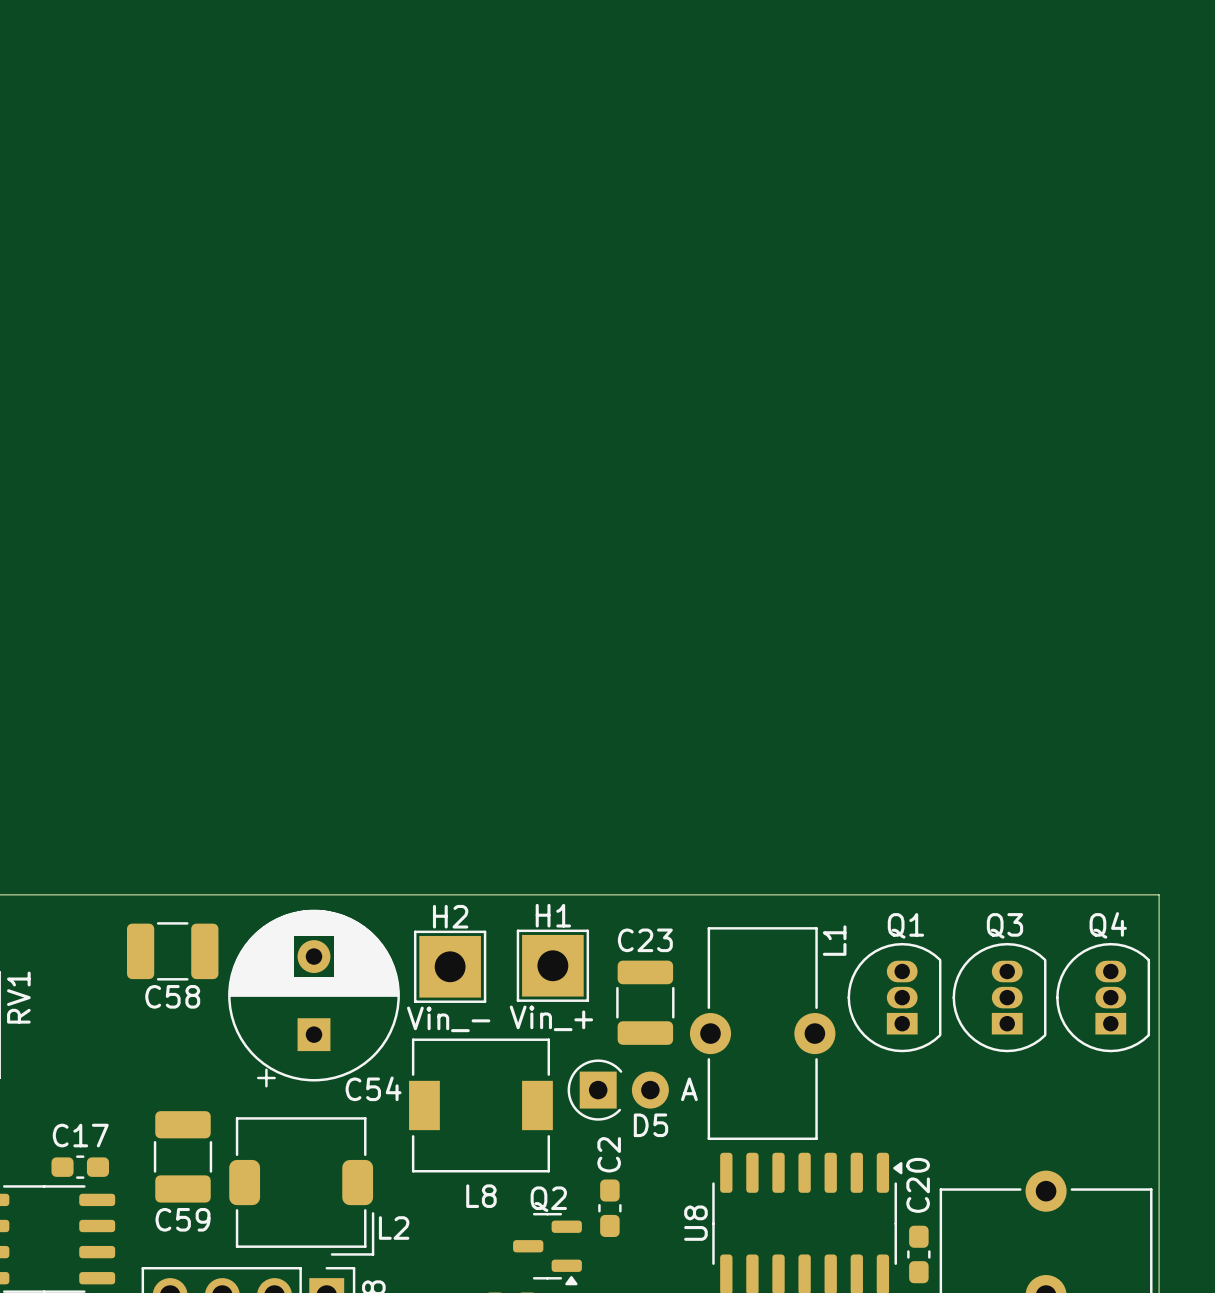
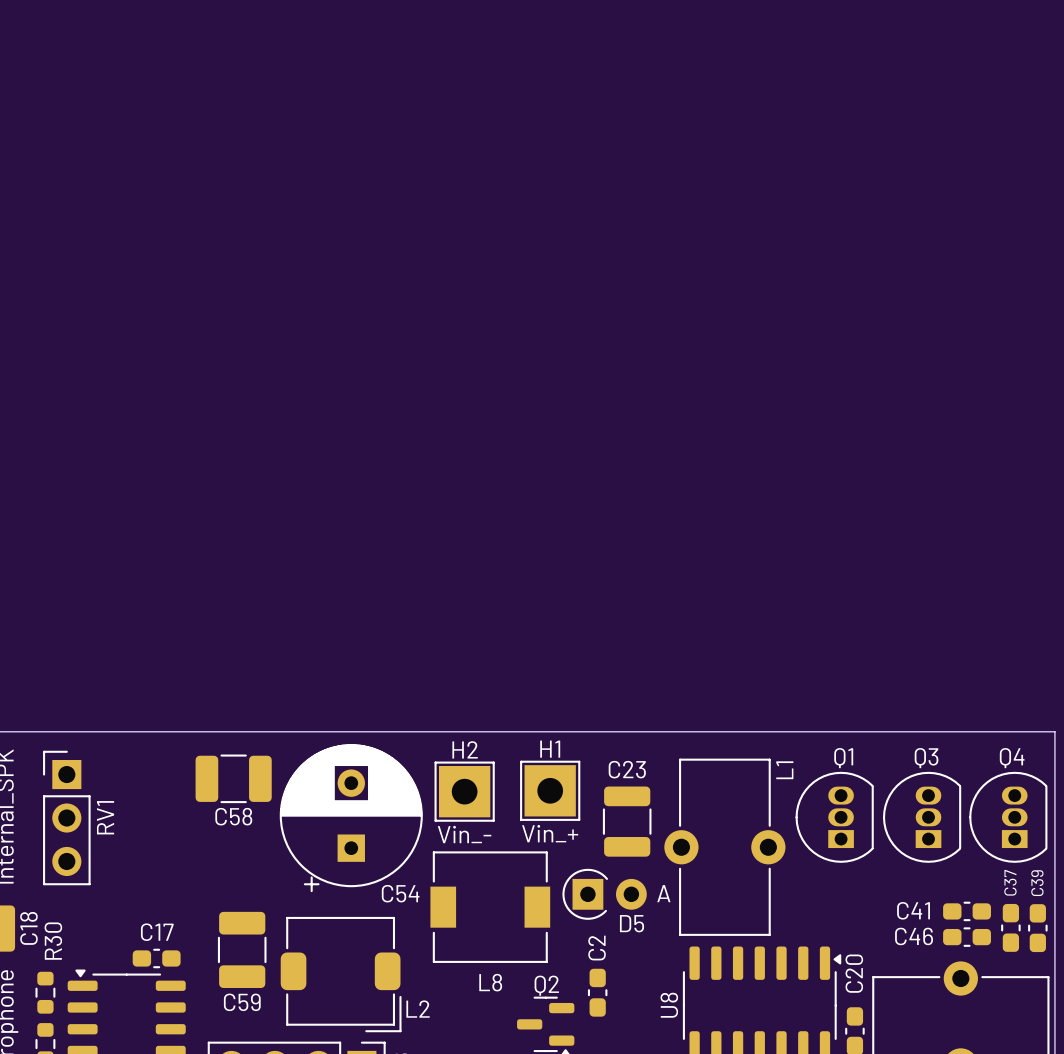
C41: none -> (967, 911)
C37: none -> (1010, 927)
C39: none -> (1037, 928)
C46: none -> (967, 937)

